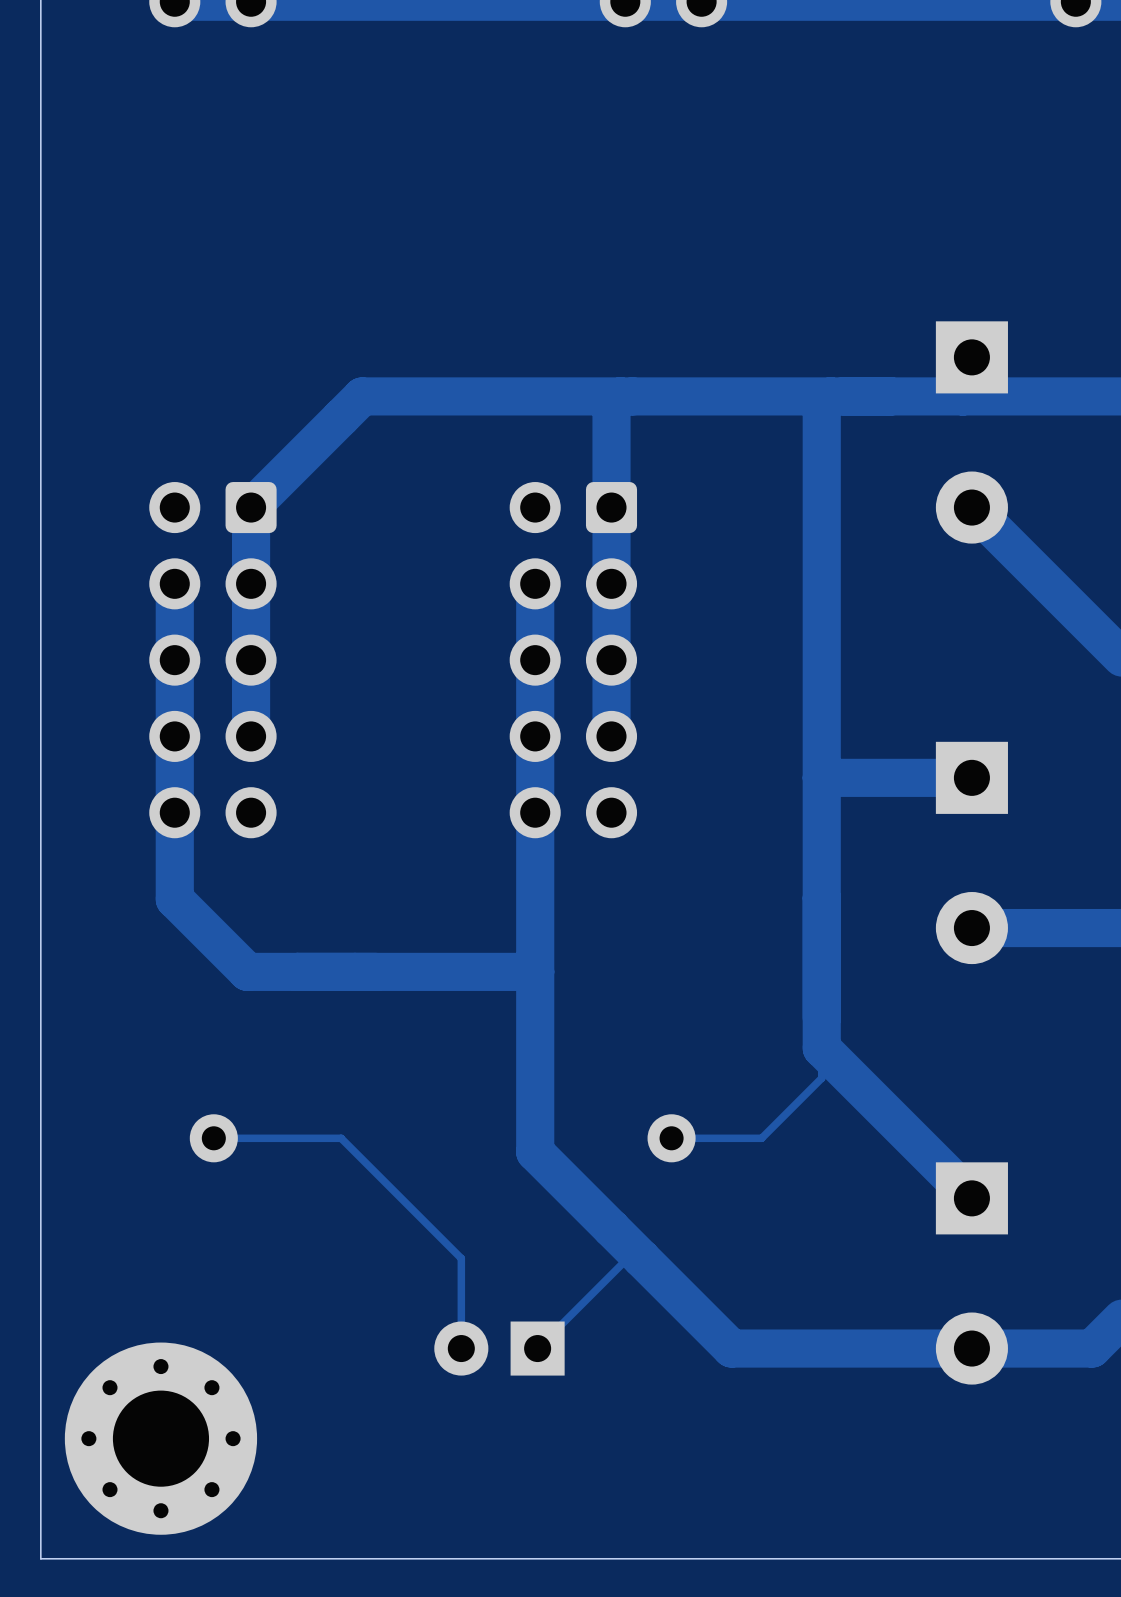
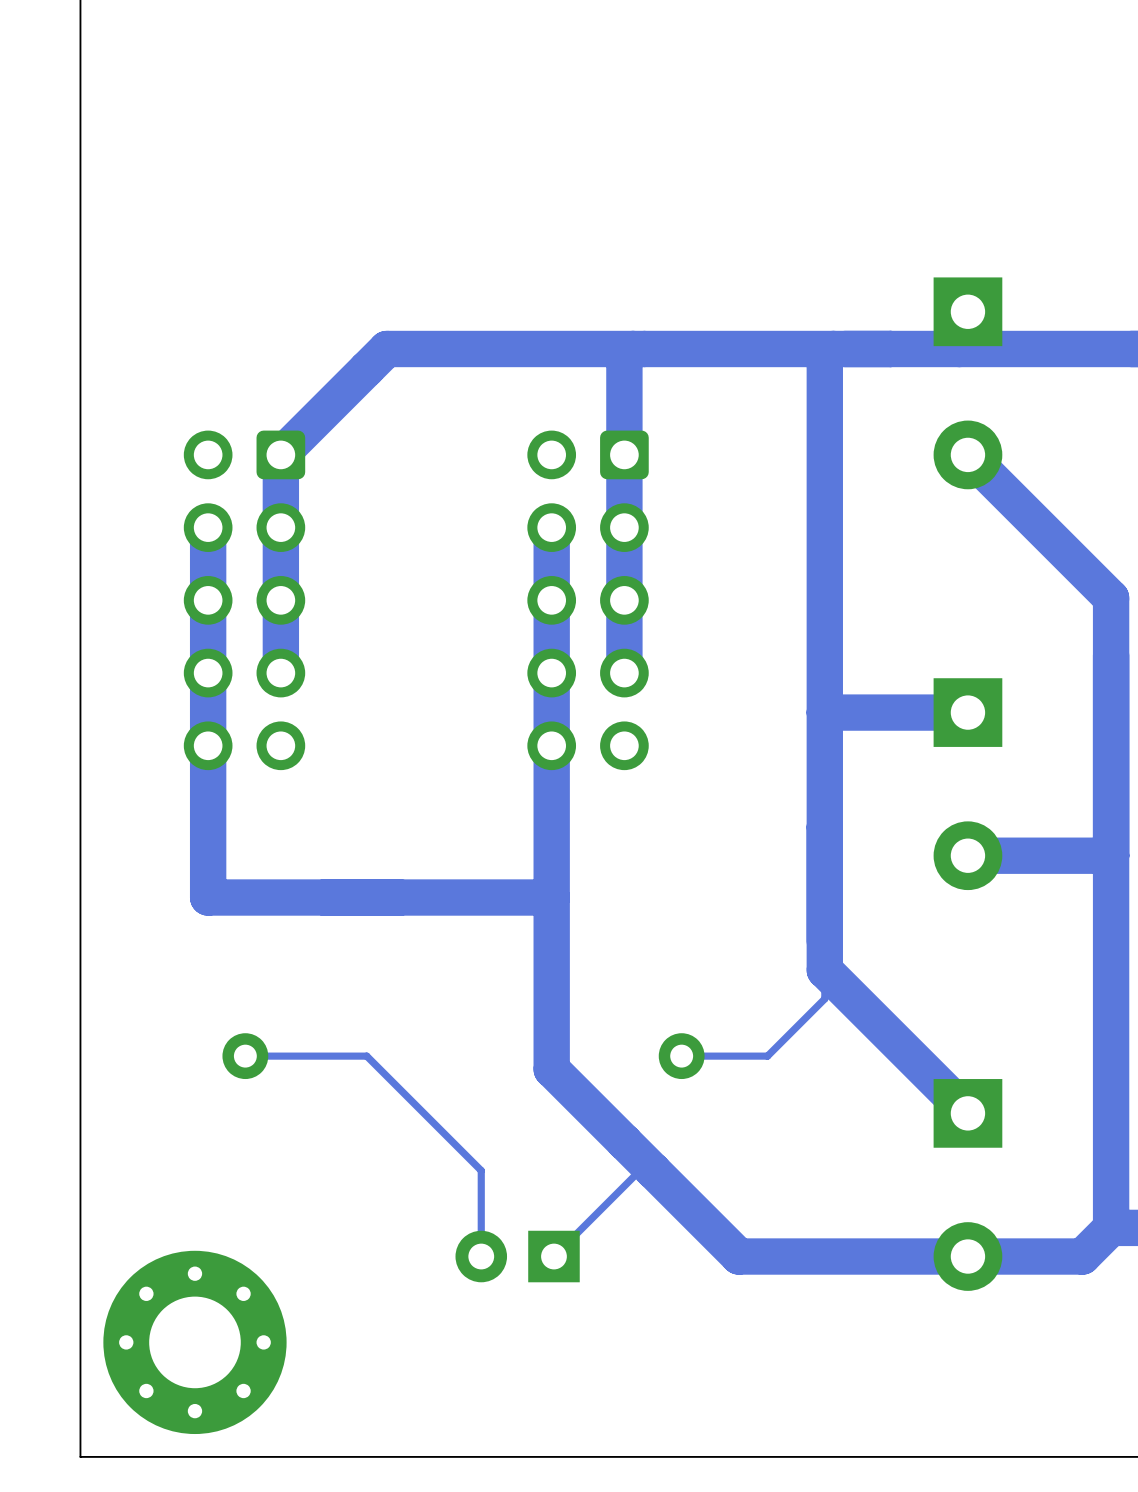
track: (174, 899) (247, 971) -> (208, 828) (208, 897) (277, 897)

